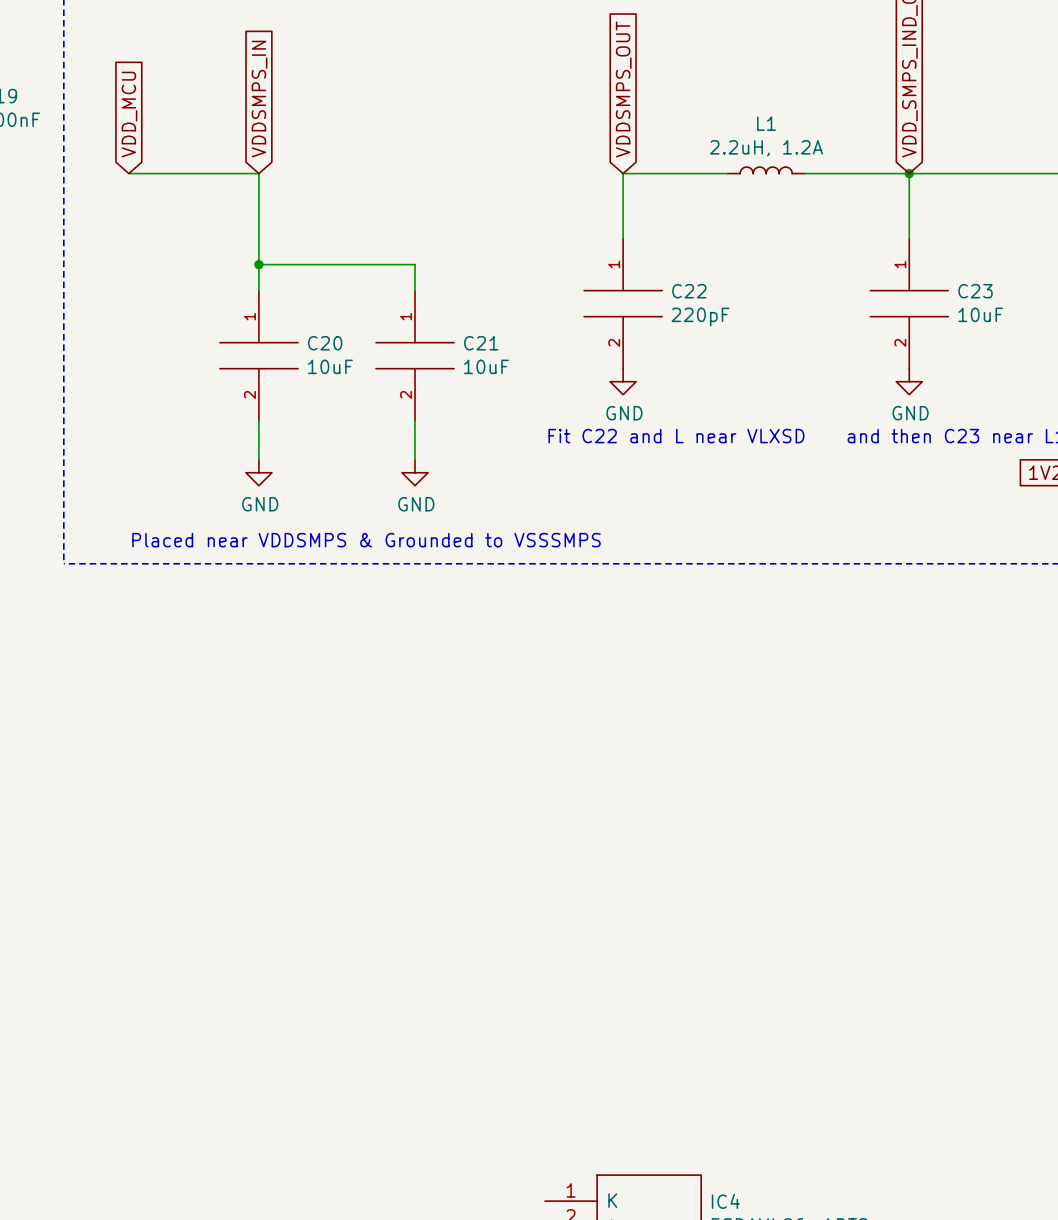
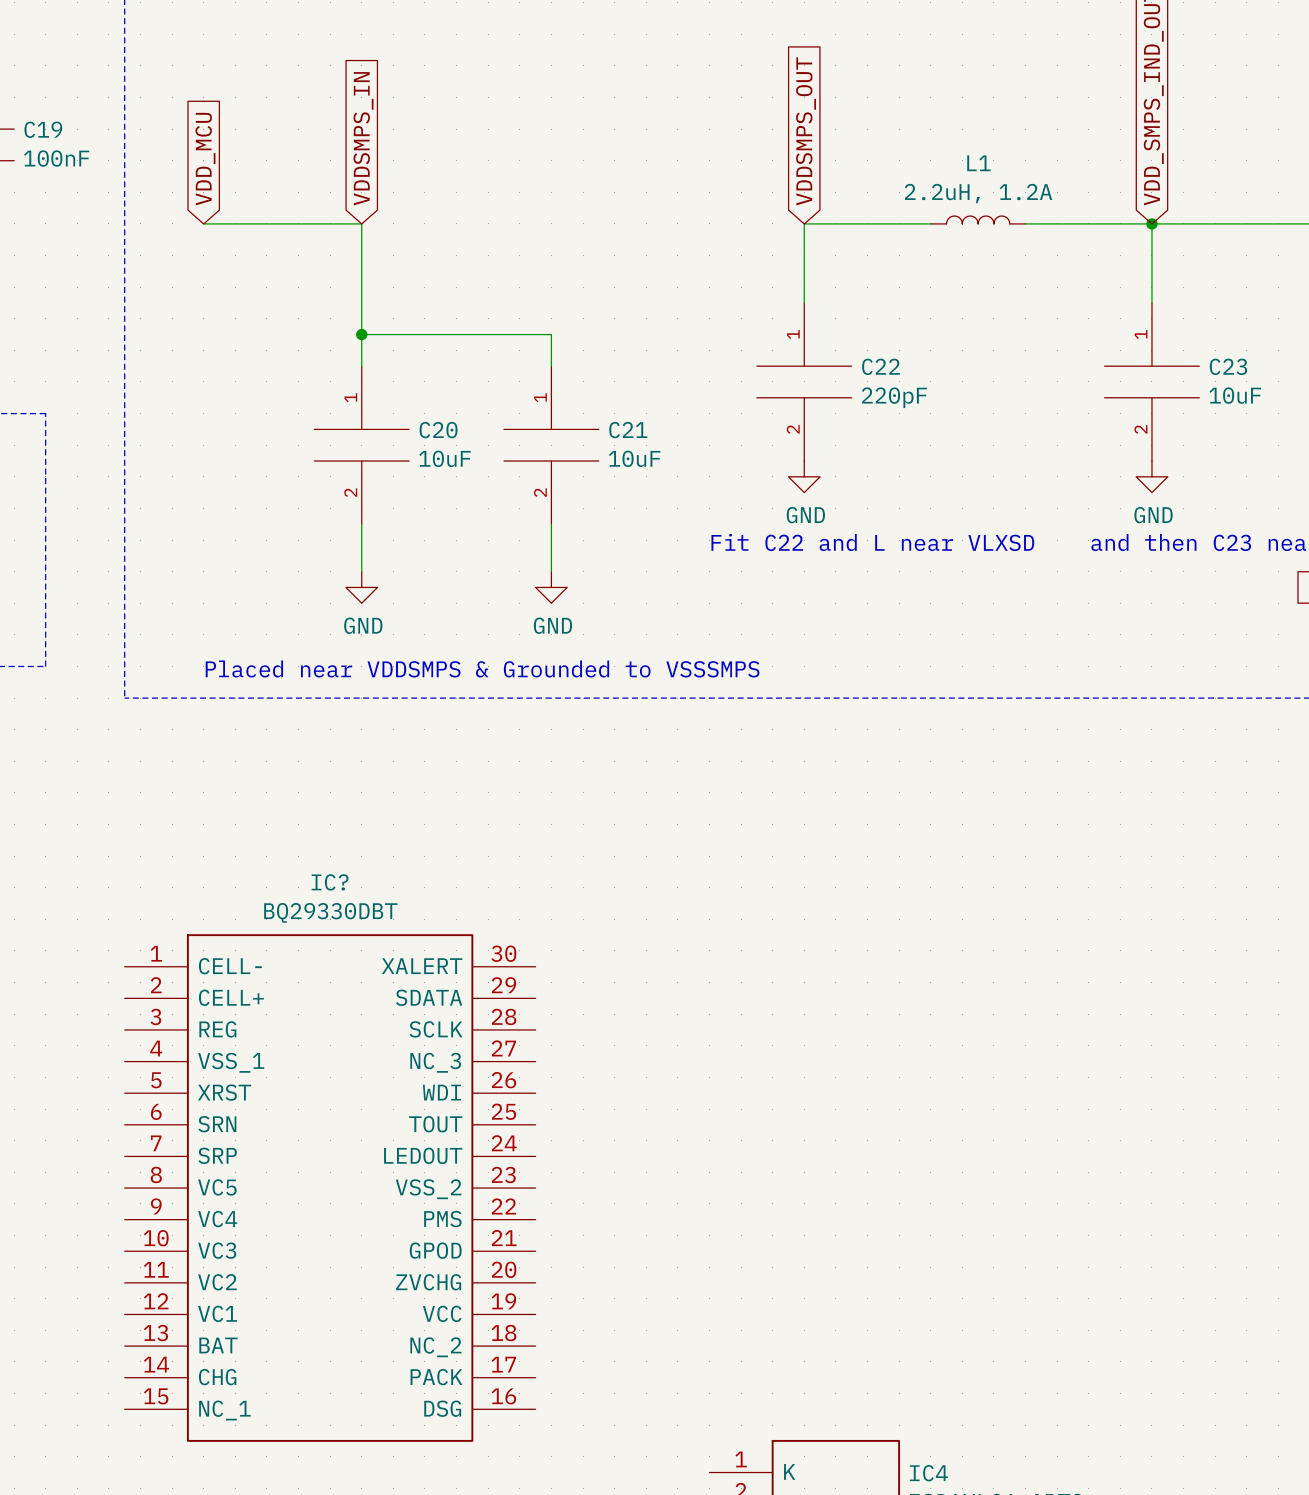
IC?: none -> BQ29330DBT (330, 1188)

